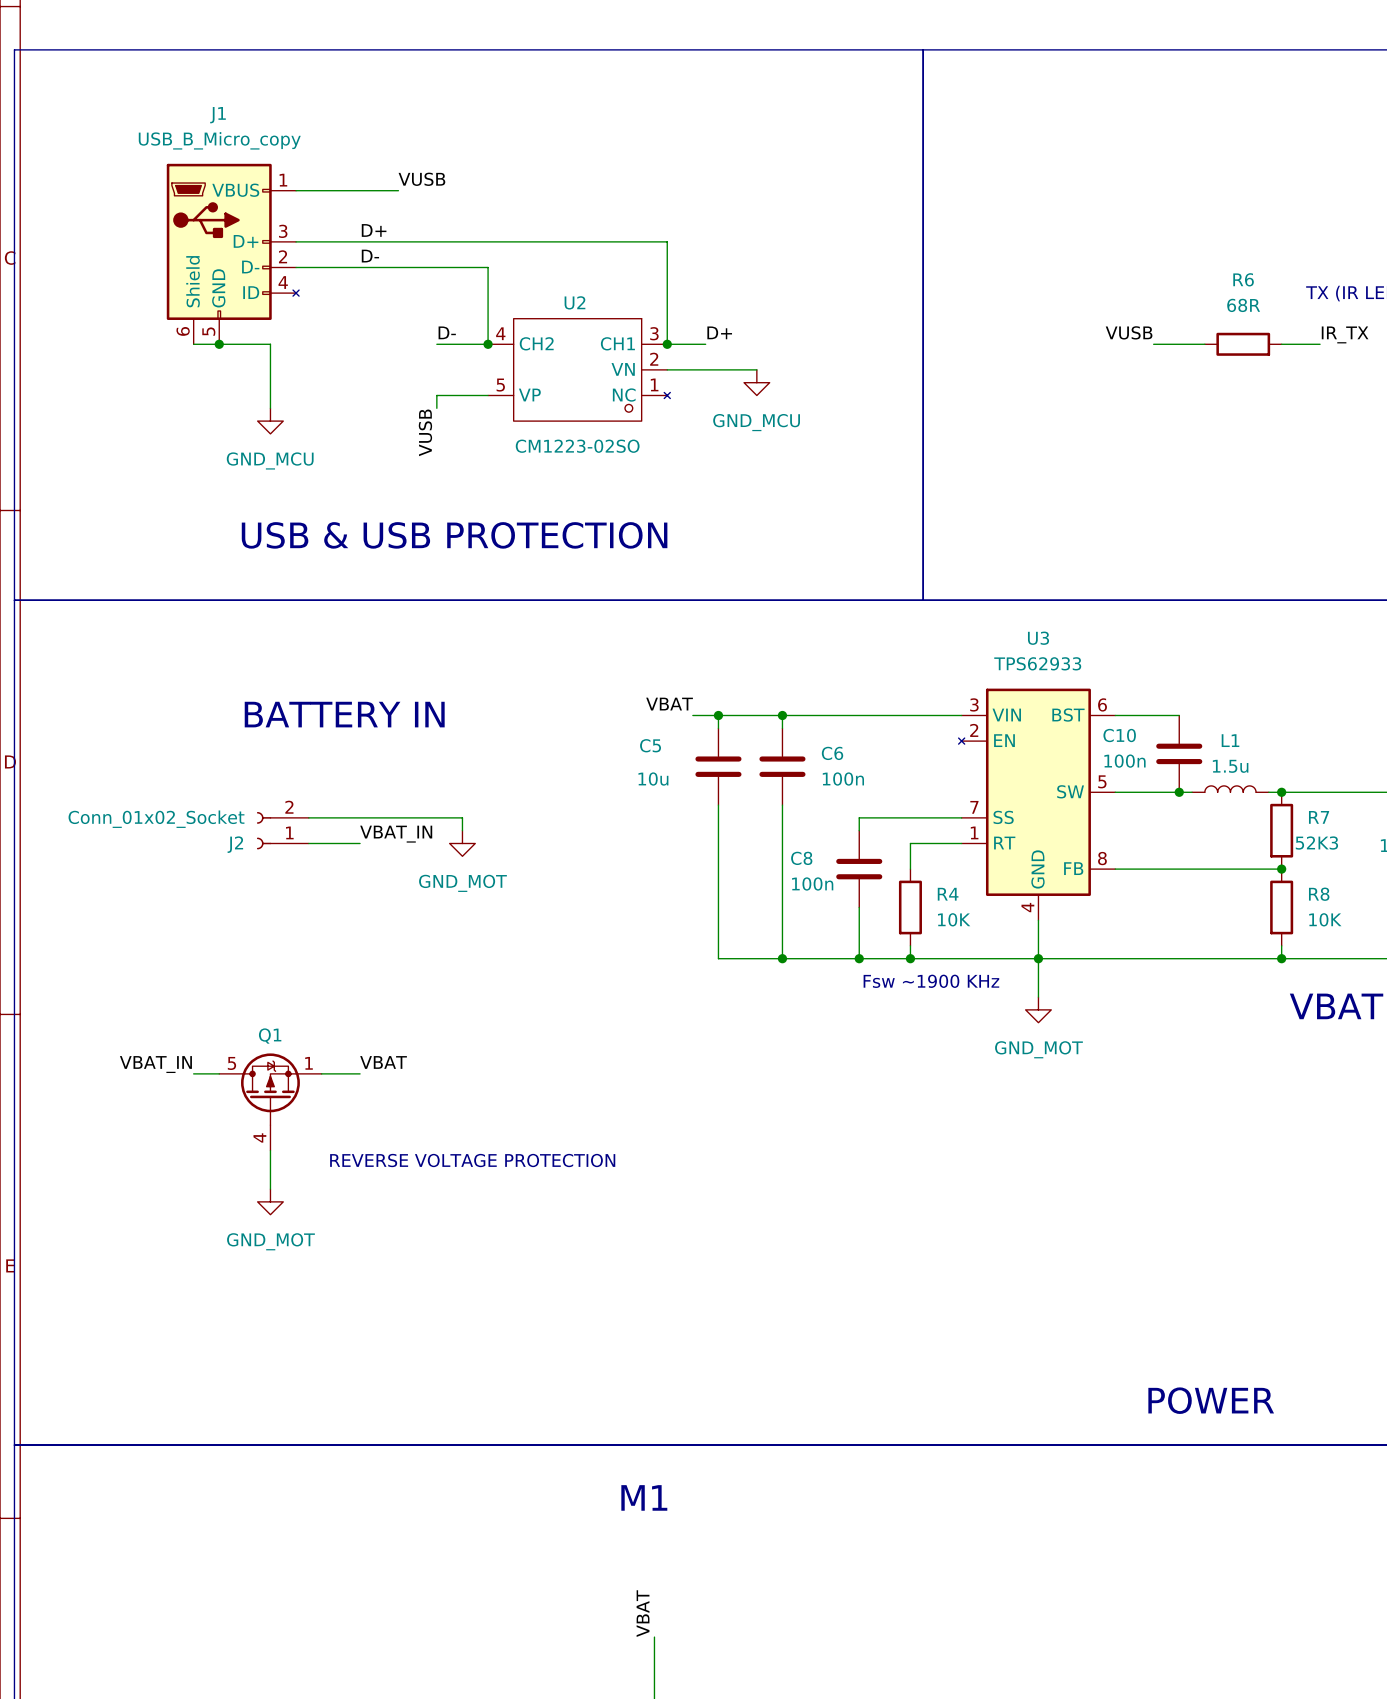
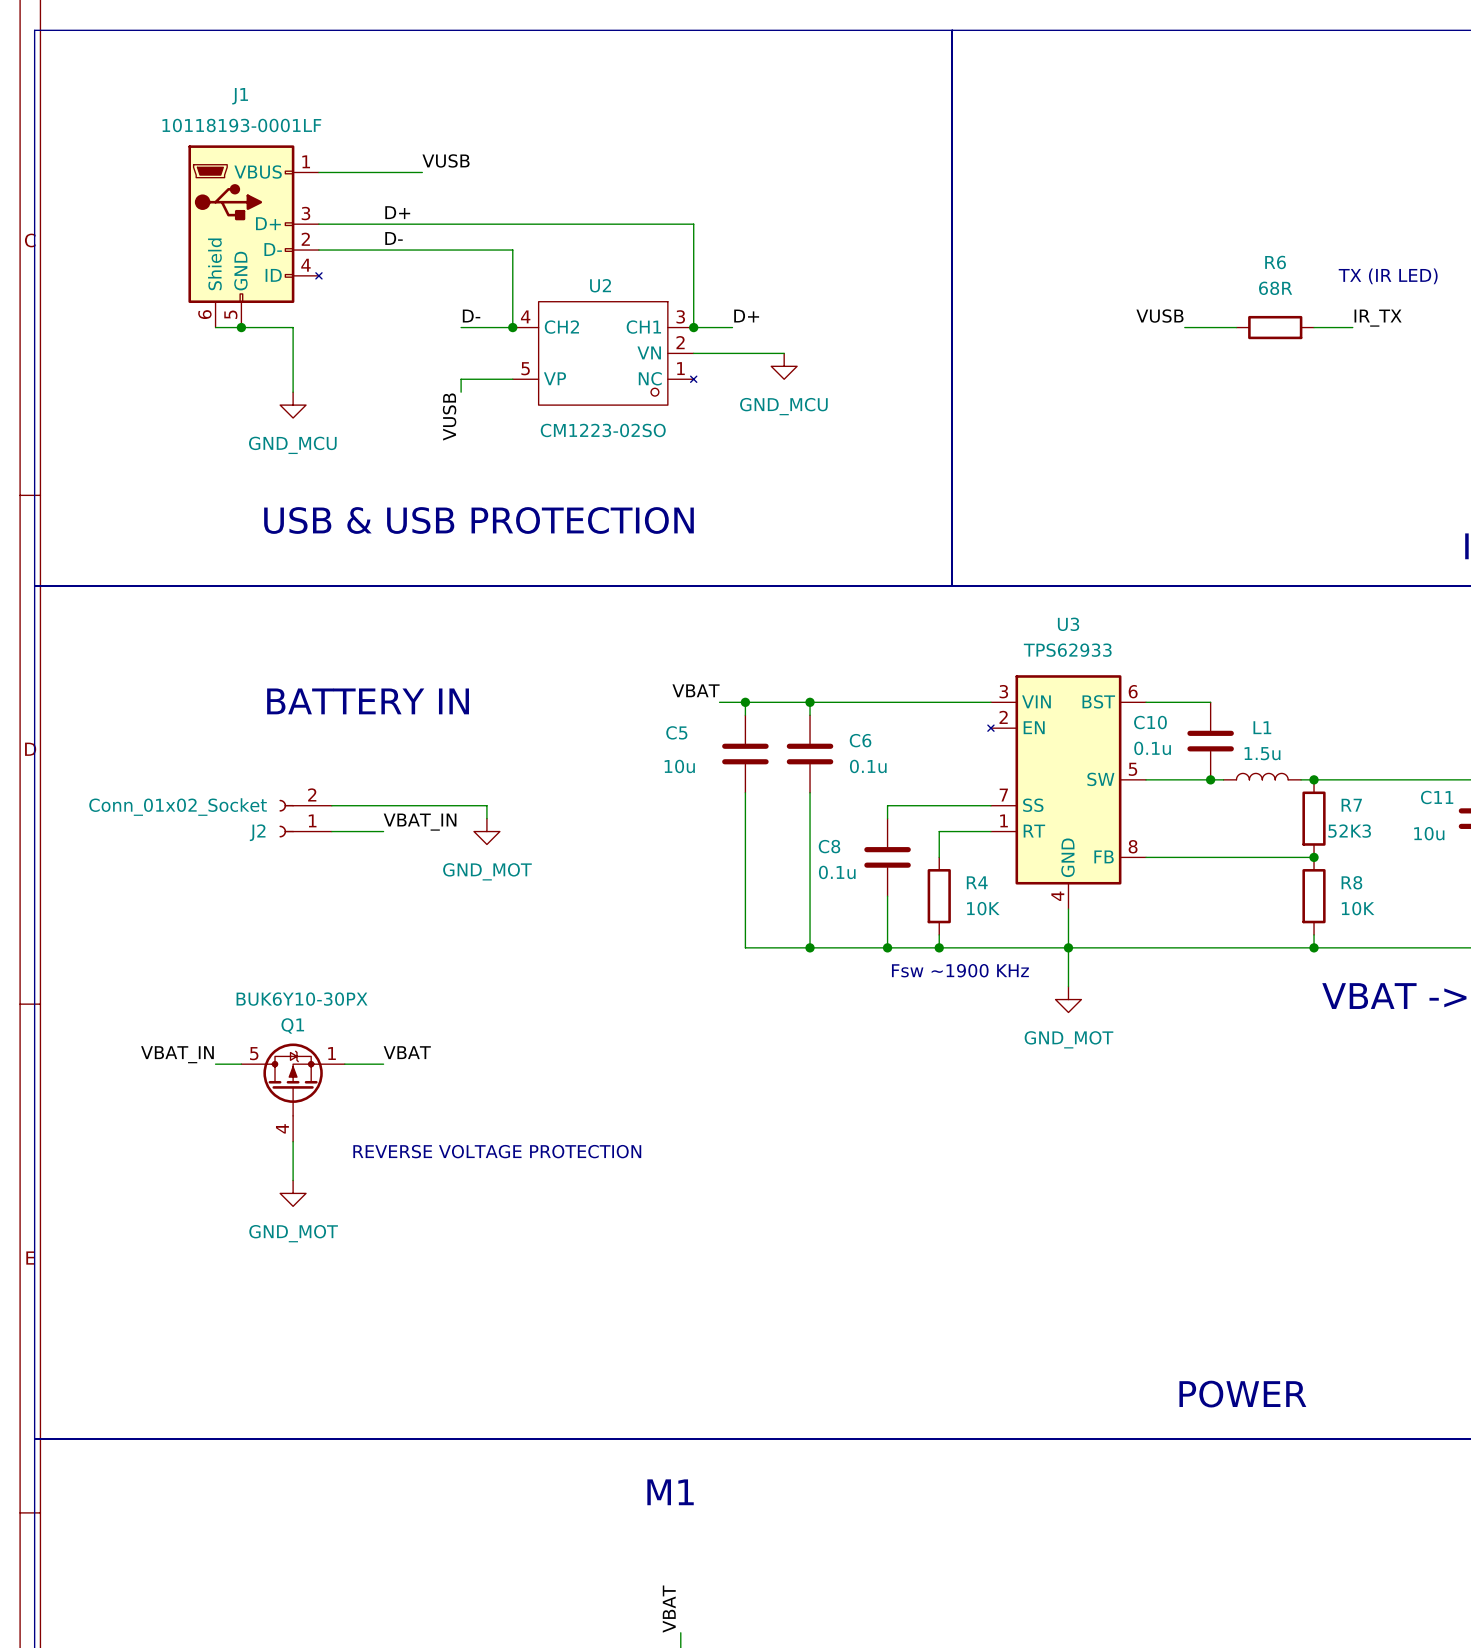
J1 value: USB_B_Micro_copy (219, 140) -> 10118193-0001LF (241, 125)
C10 value: 100n (1124, 761) -> 0.1u (1152, 748)
C6 value: 100n (843, 779) -> 0.1u (868, 766)
C8 value: 100n (812, 883) -> 0.1u (837, 872)
Q1 value: none -> BUK6Y10-30PX (302, 999)

